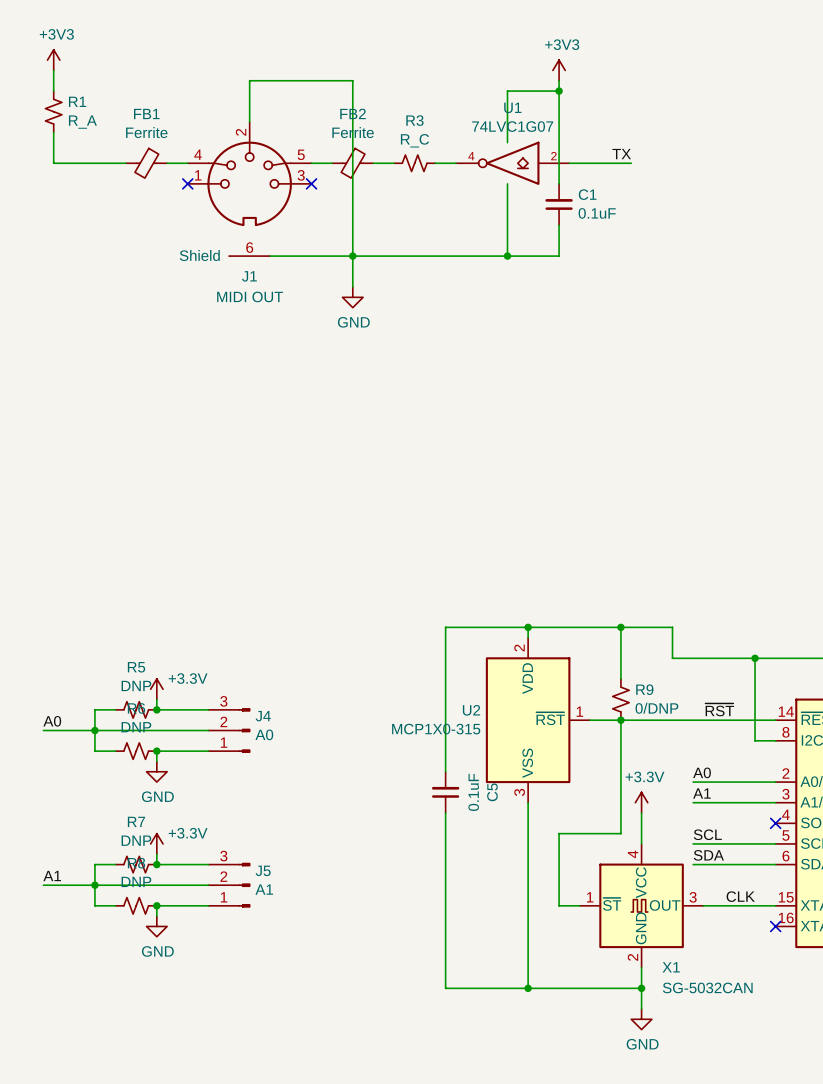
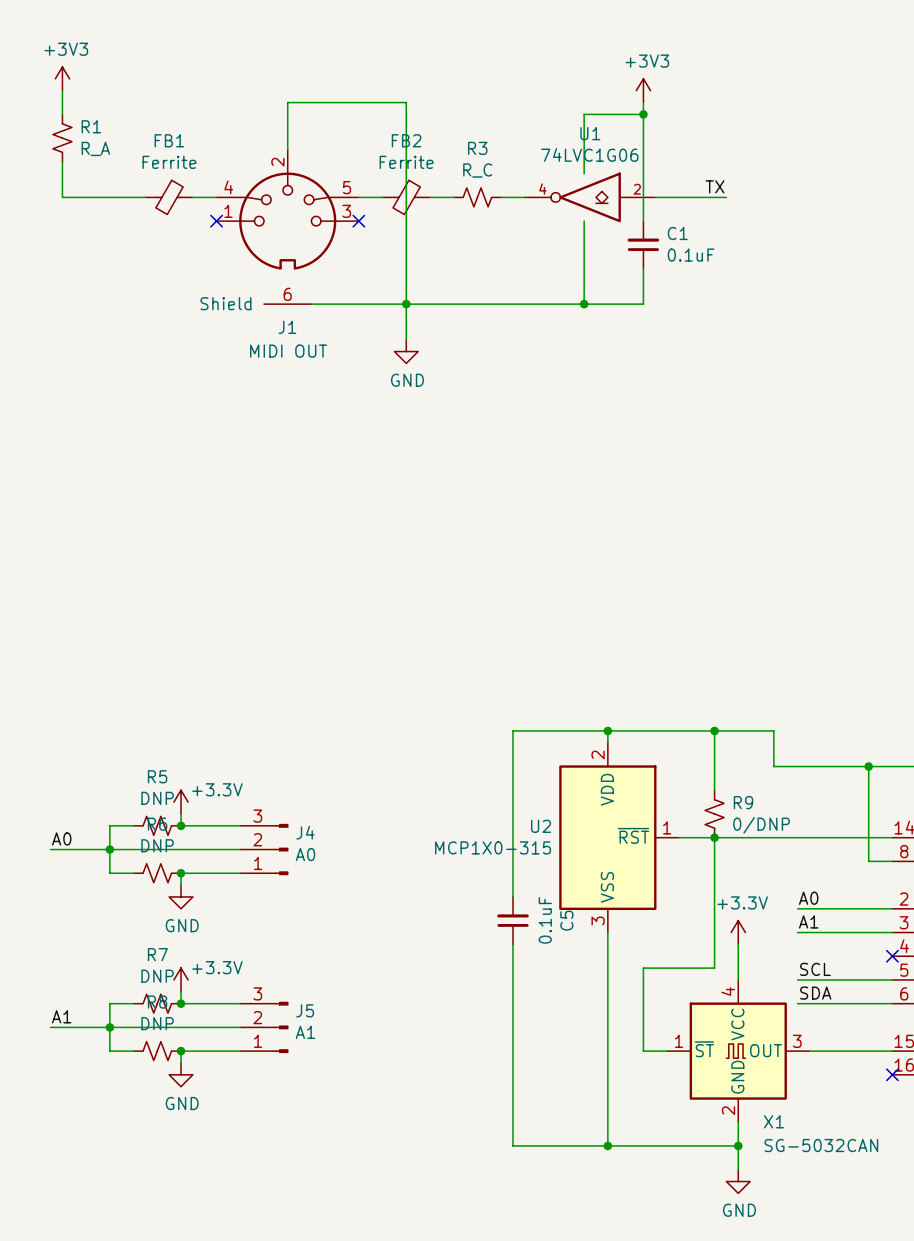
U1 value: 74LVC1G07 (512, 126) -> 74LVC1G06 (589, 154)
label: ~{RST} (719, 709) -> none
label: CLK (740, 896) -> none

